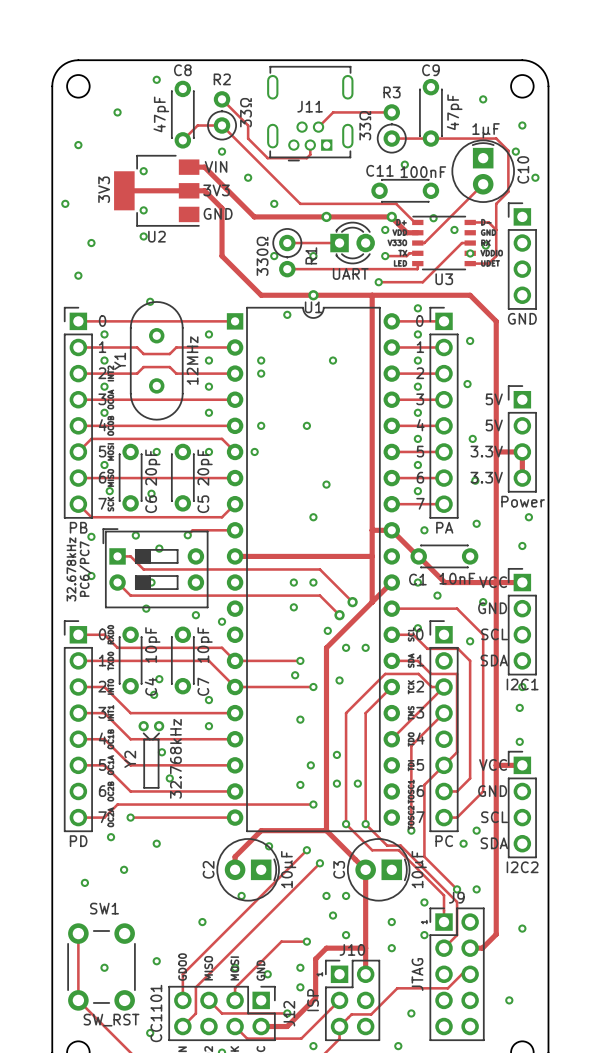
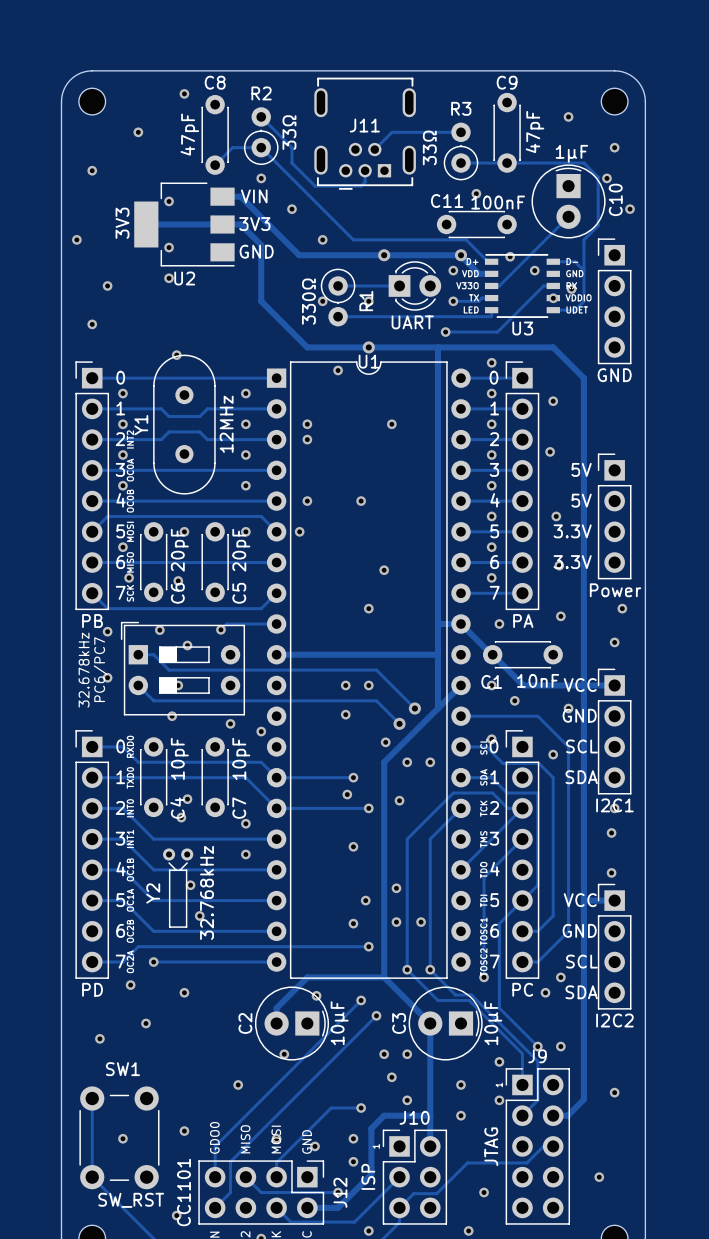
track: (496, 451) (522, 451) (522, 478) -> none

